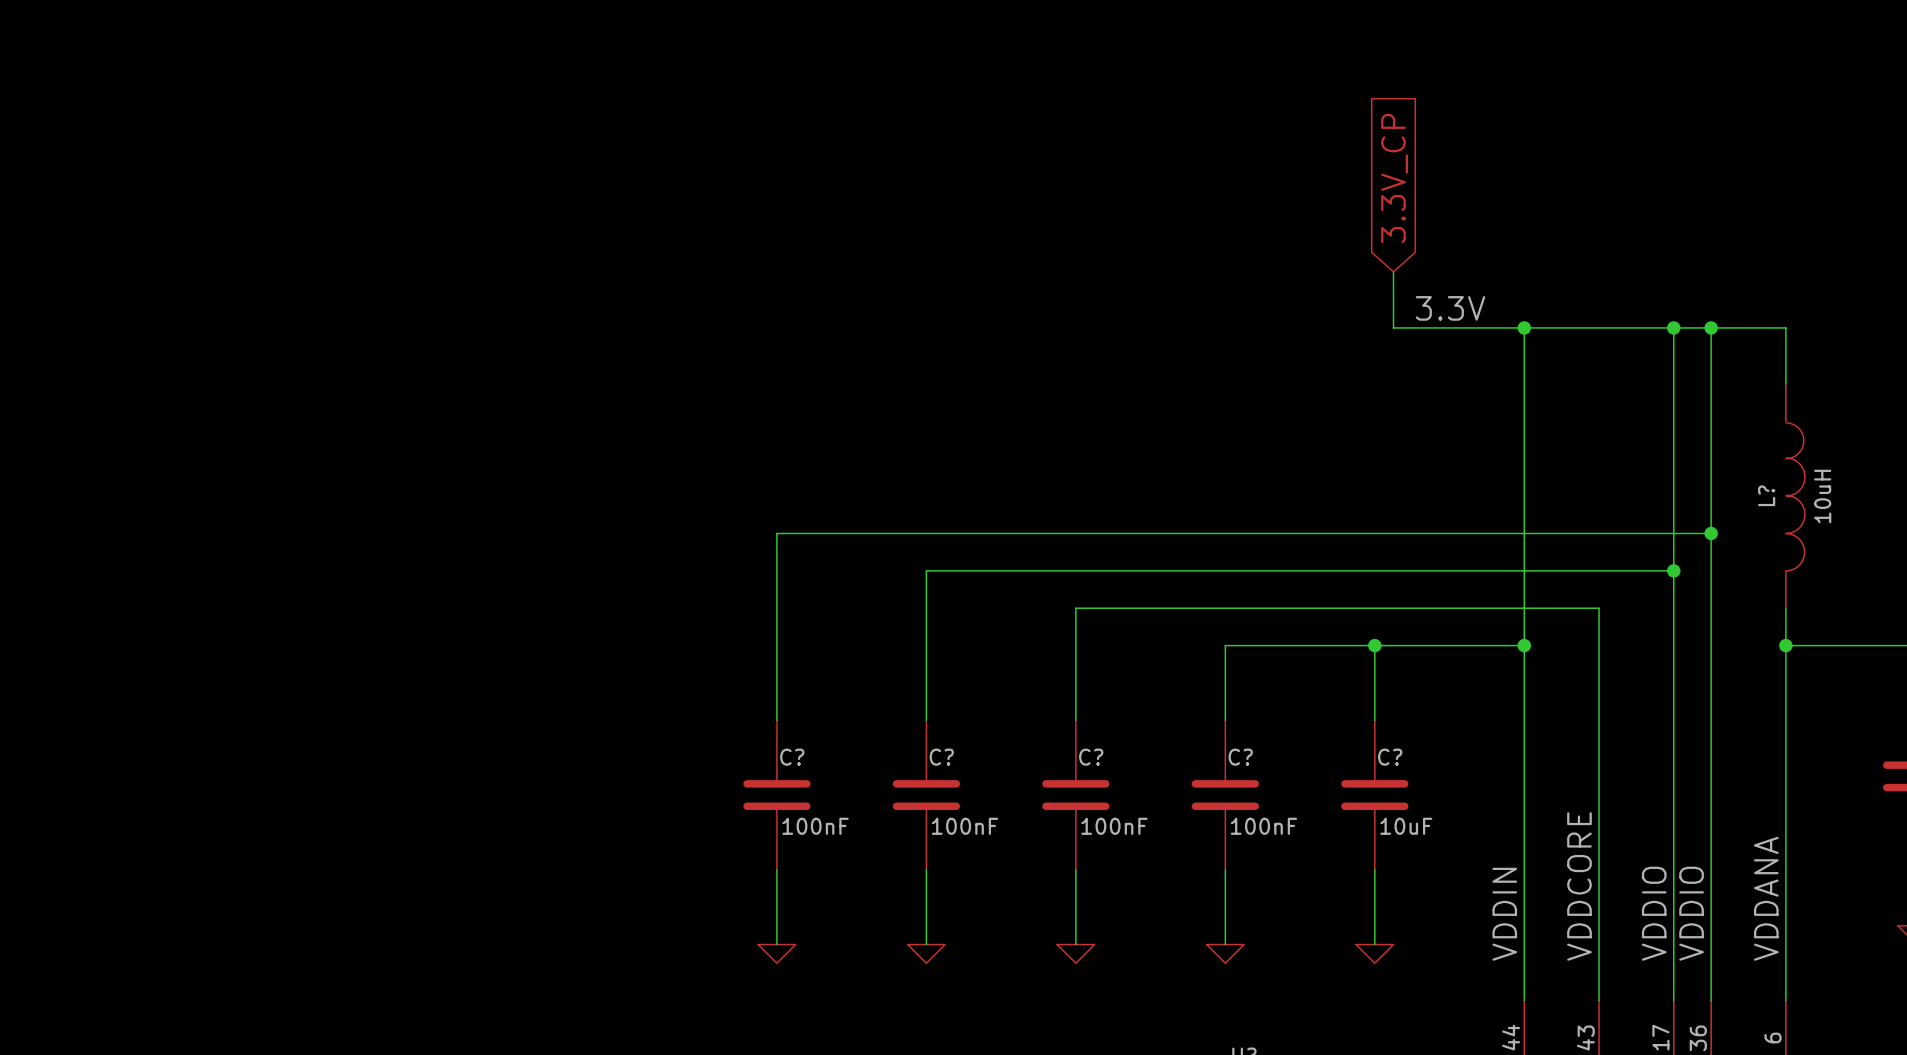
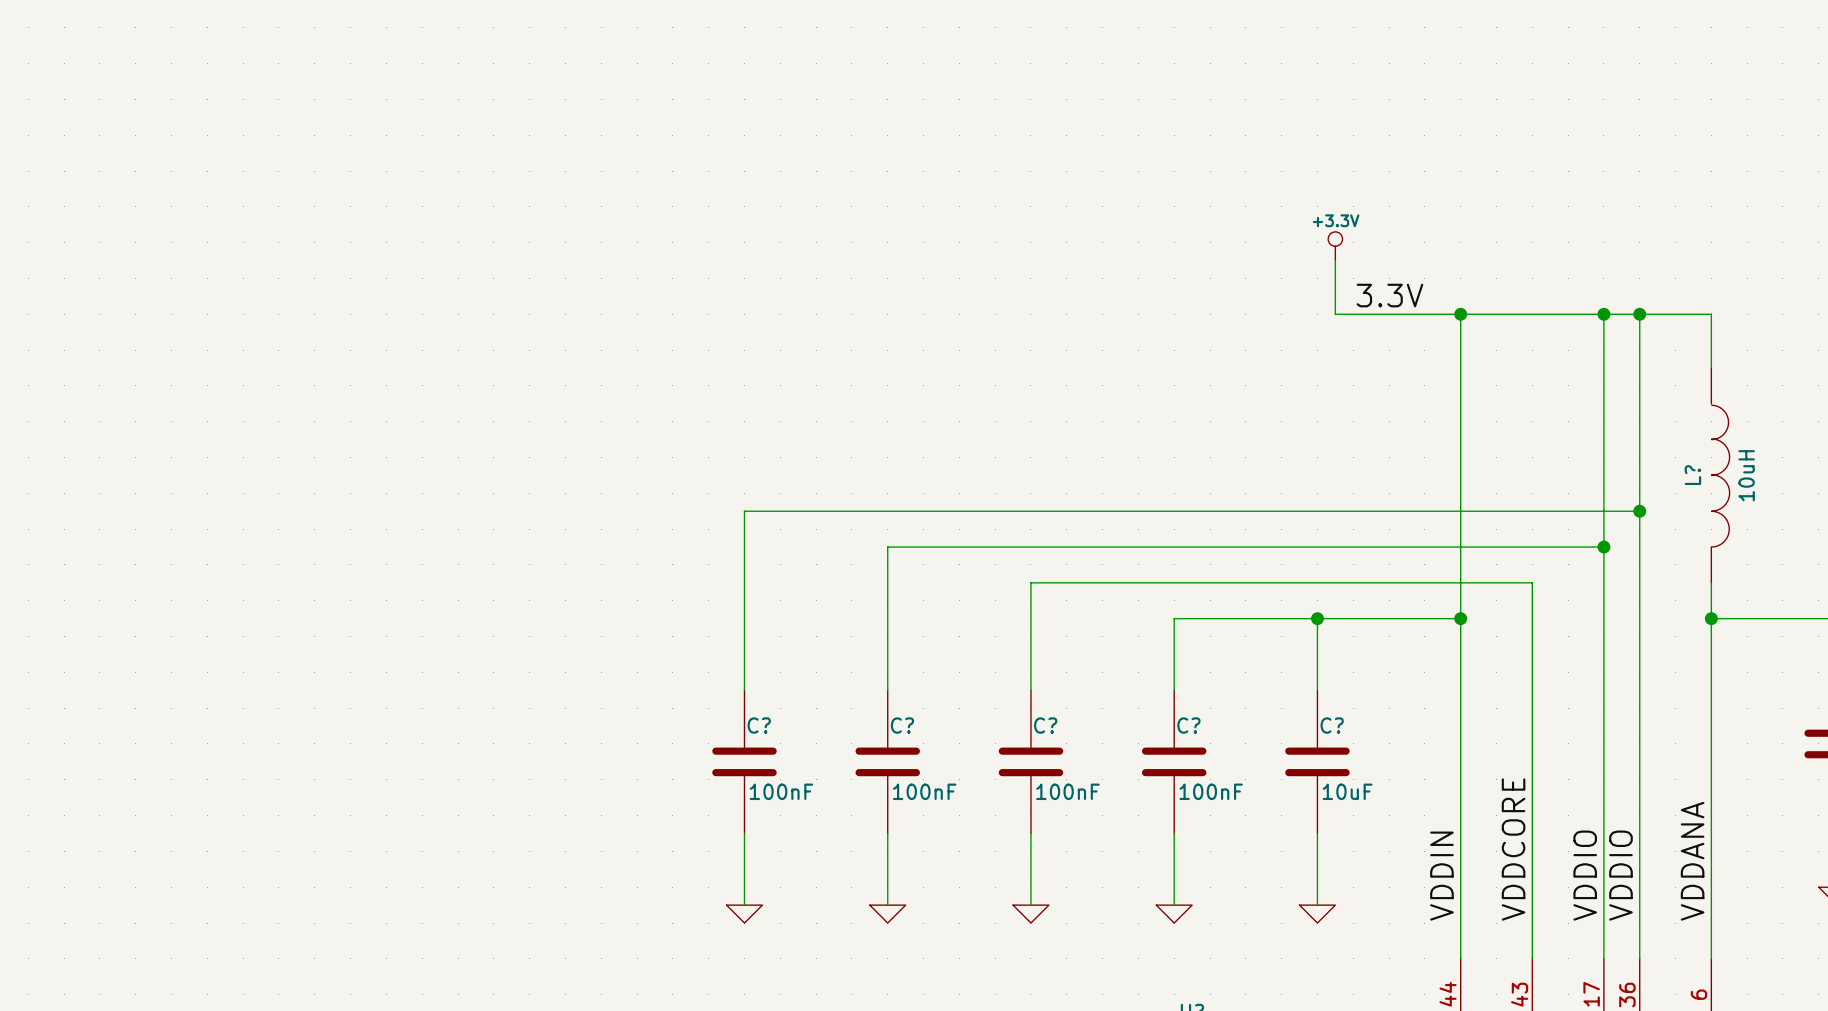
global label: 3.3V_CP (1394, 178) -> none
power symbol: none -> +3.3V (1335, 246)

